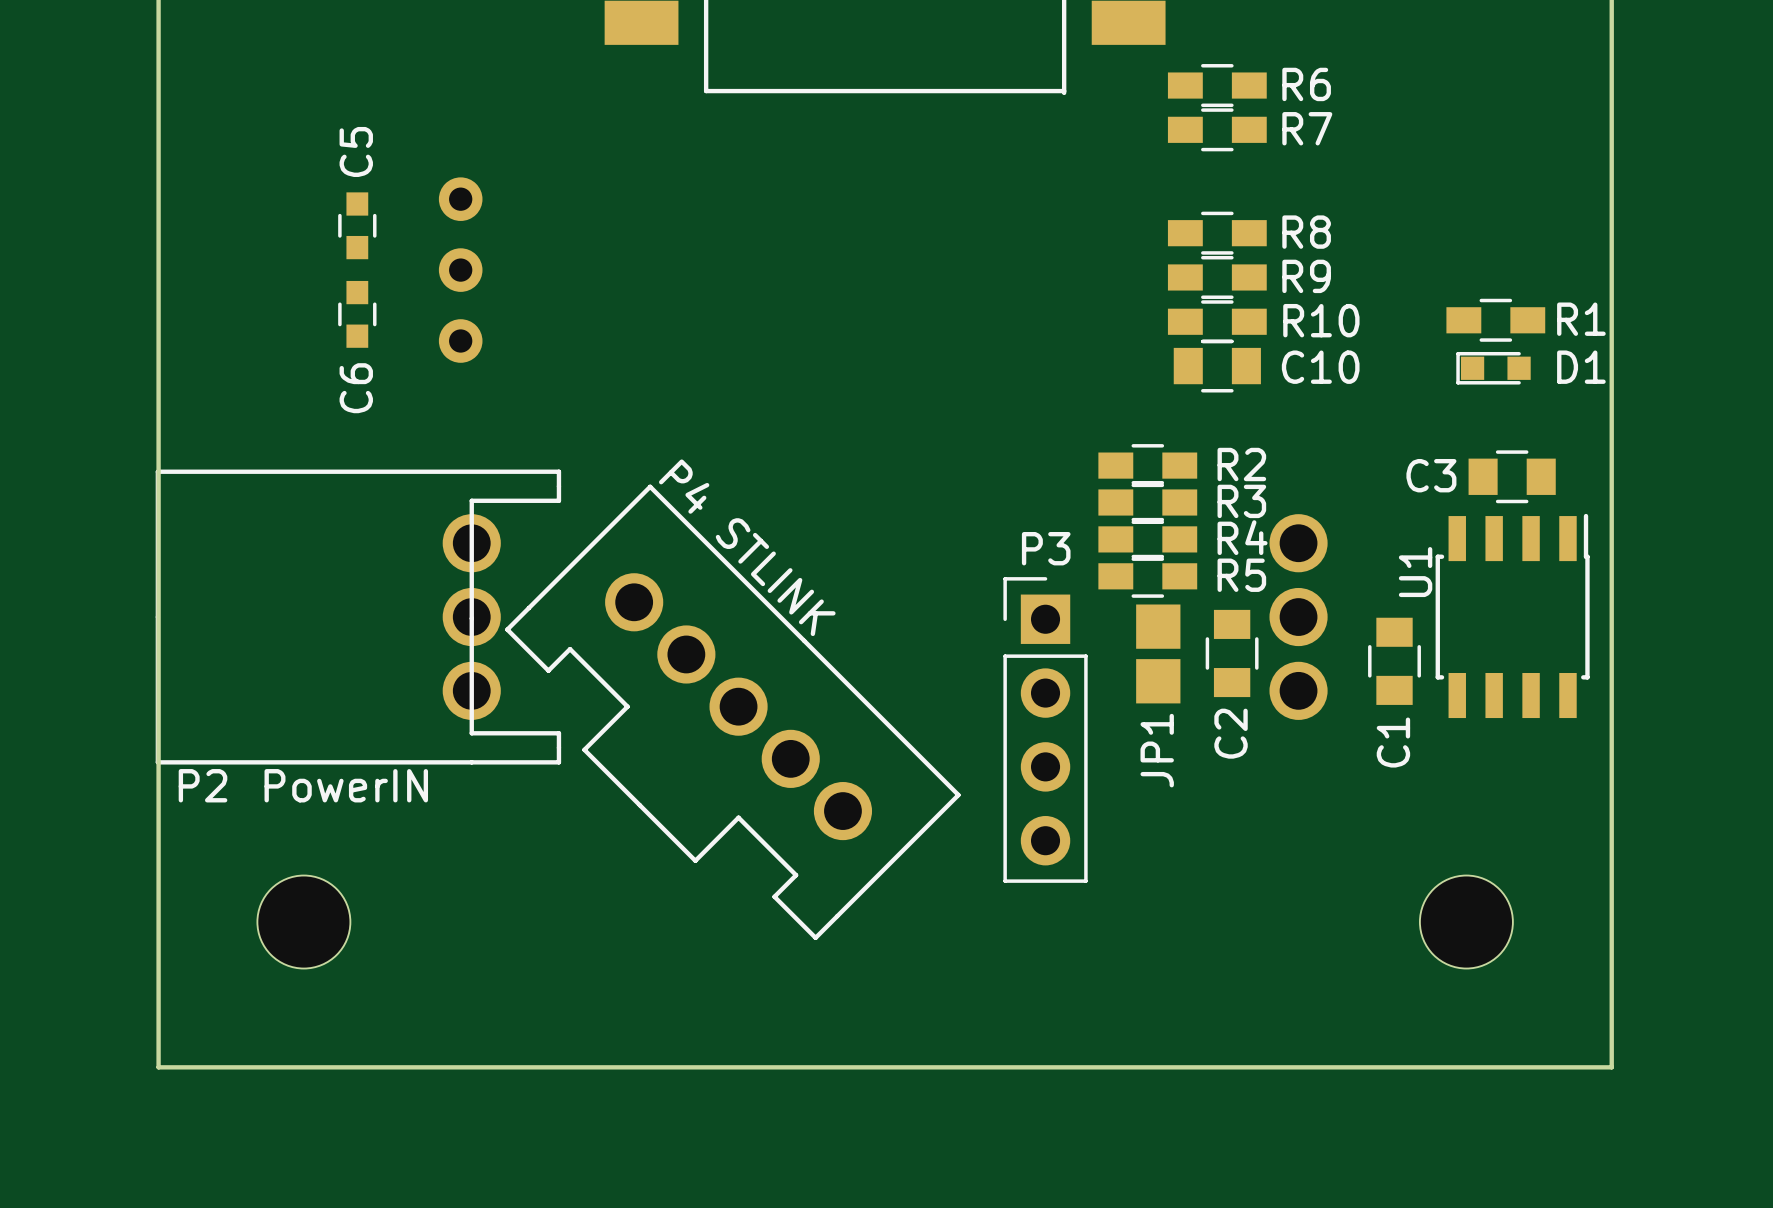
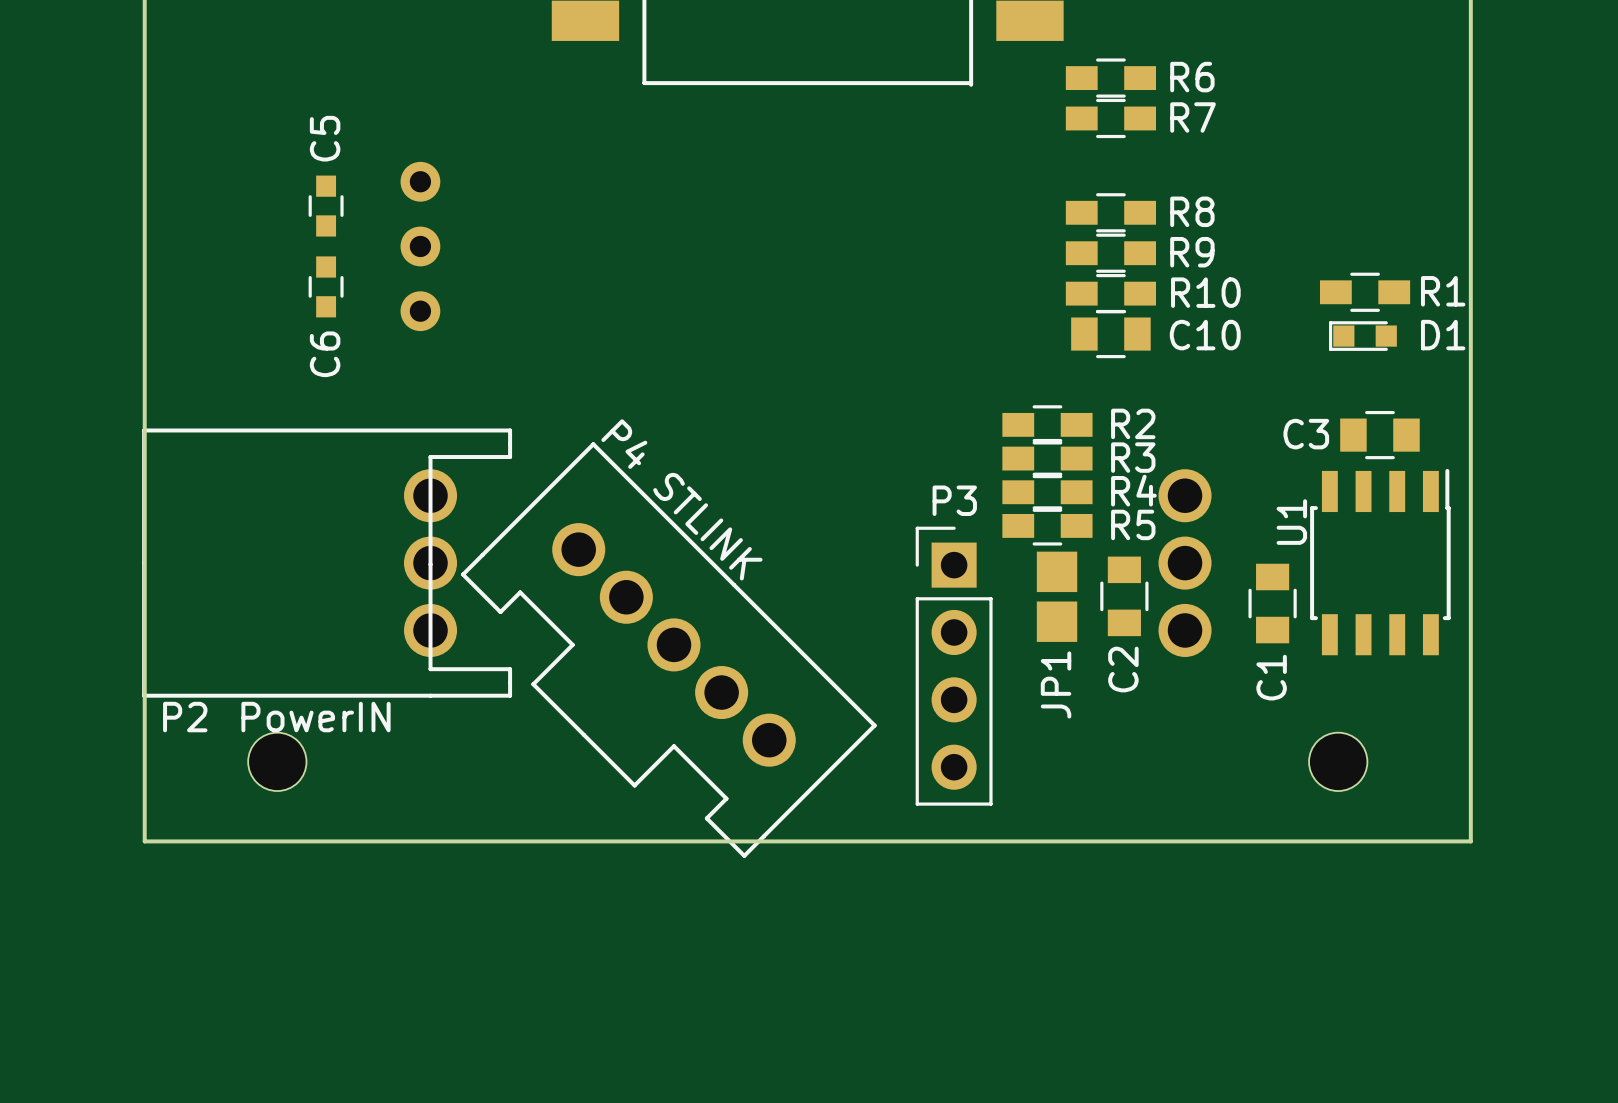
part: none -> (277, 761)
part: none -> (1338, 761)
board edge: (158, 922) (158, 1067) (1611, 1067) (1611, 922) -> (144, 841) (1470, 841)
part: (303, 922) -> none
part: (1466, 922) -> none

